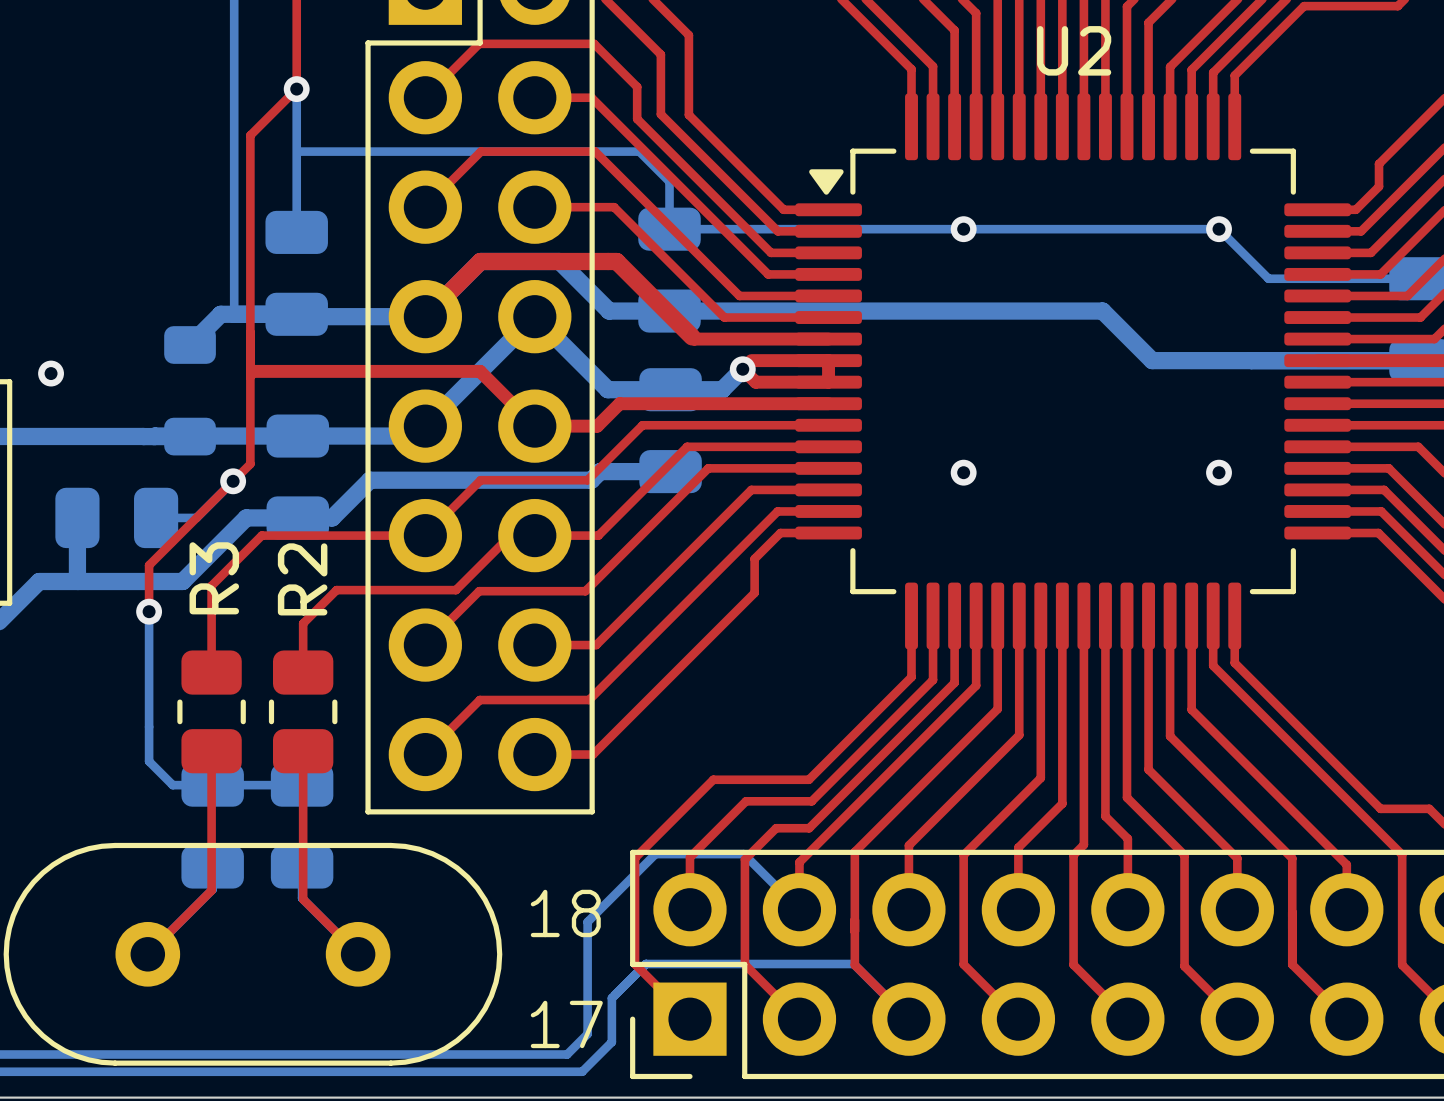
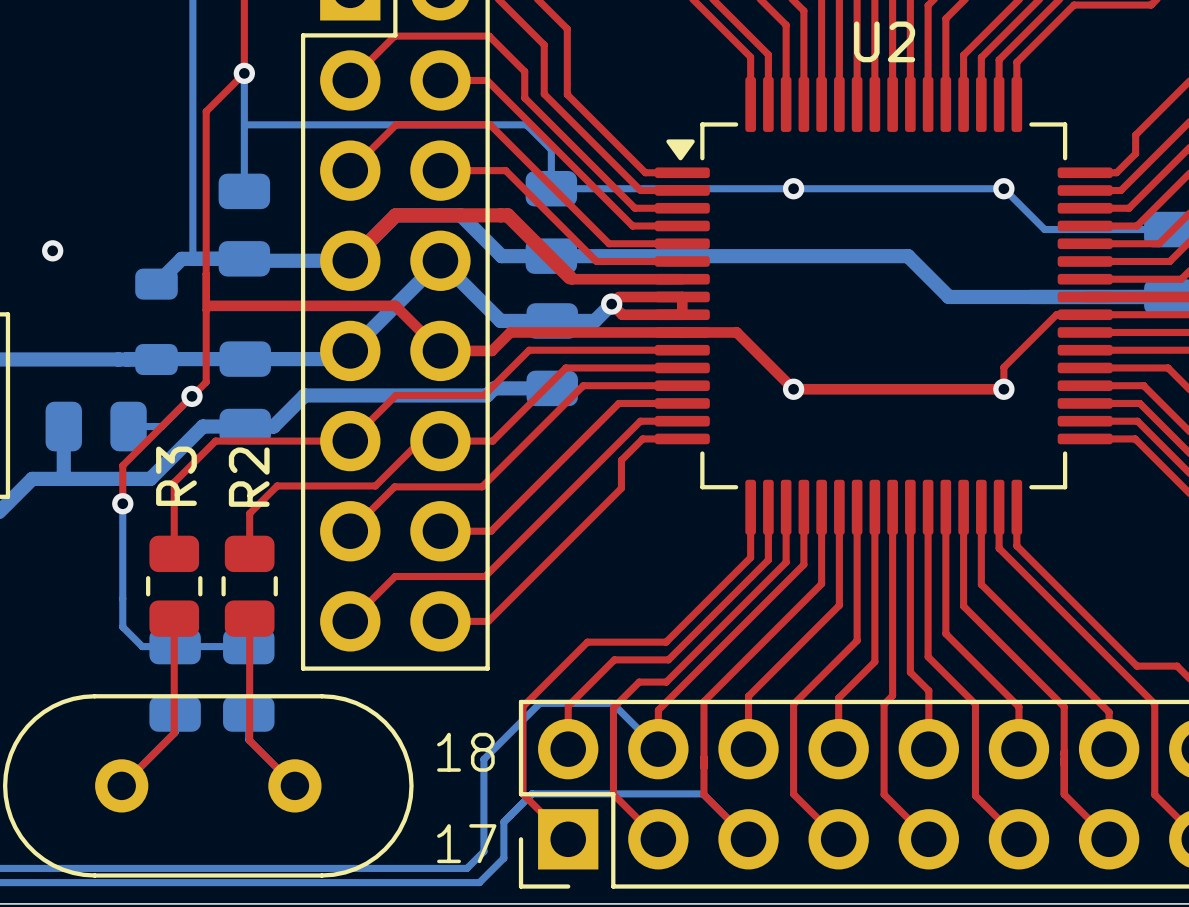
via position: (51, 373) -> (52, 250)
top track: none -> (1085, 314) (1056, 314) (1003, 367) (1003, 389) (793, 389) (736, 332) (682, 332)

